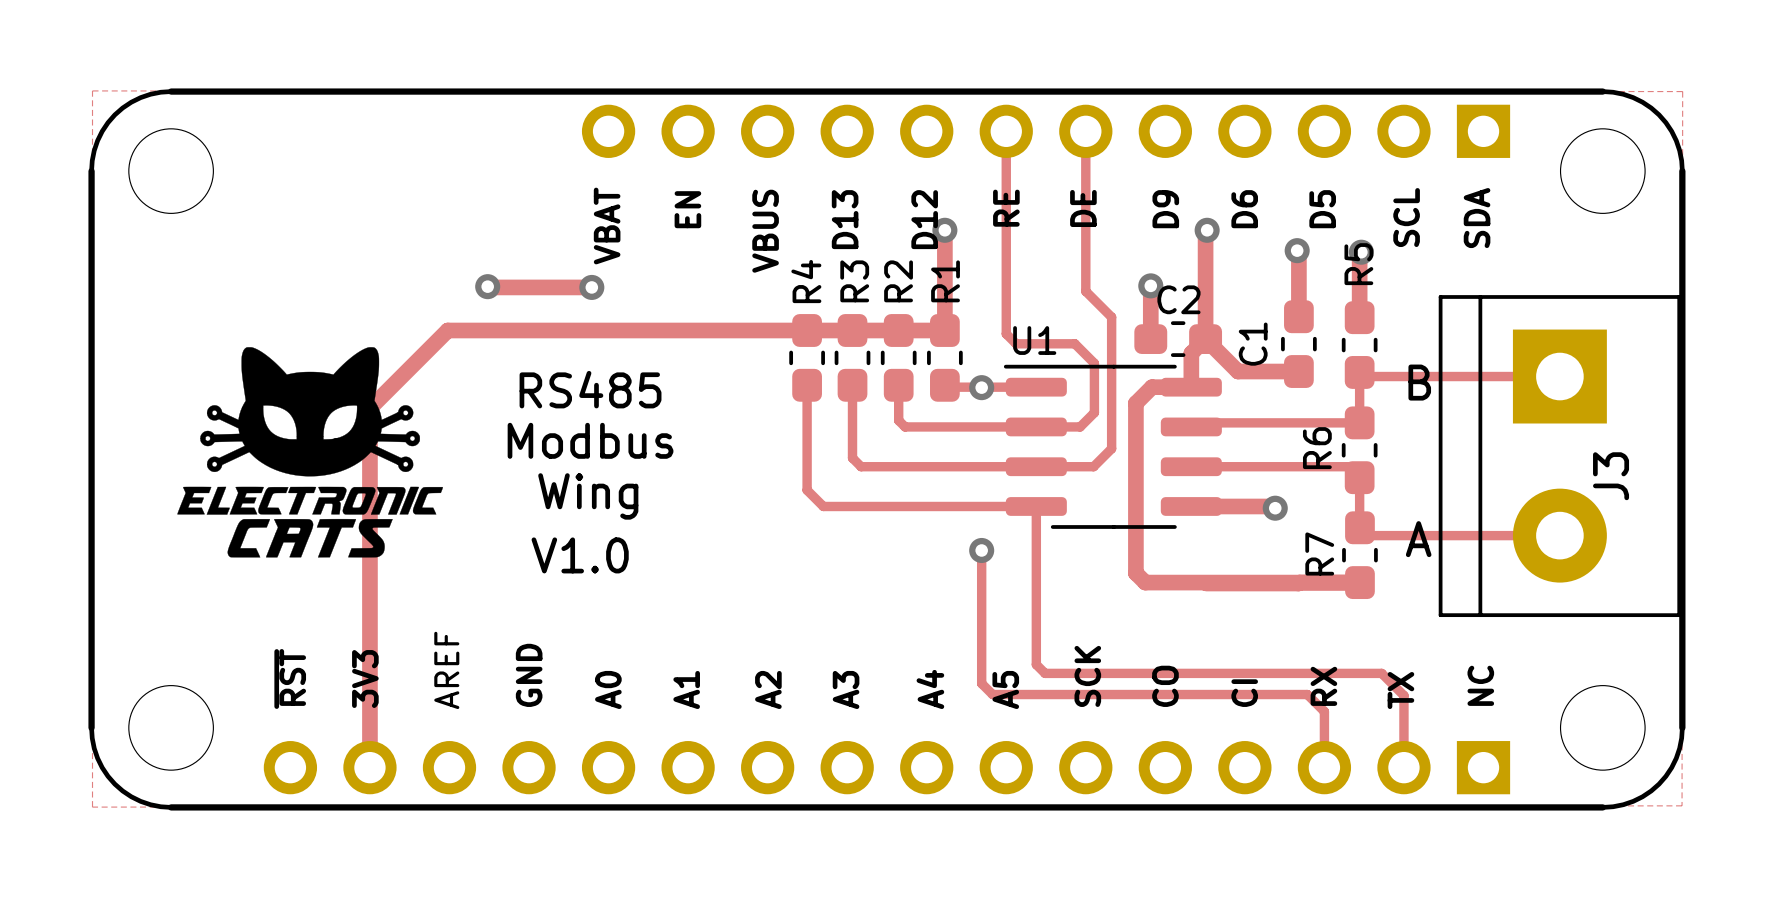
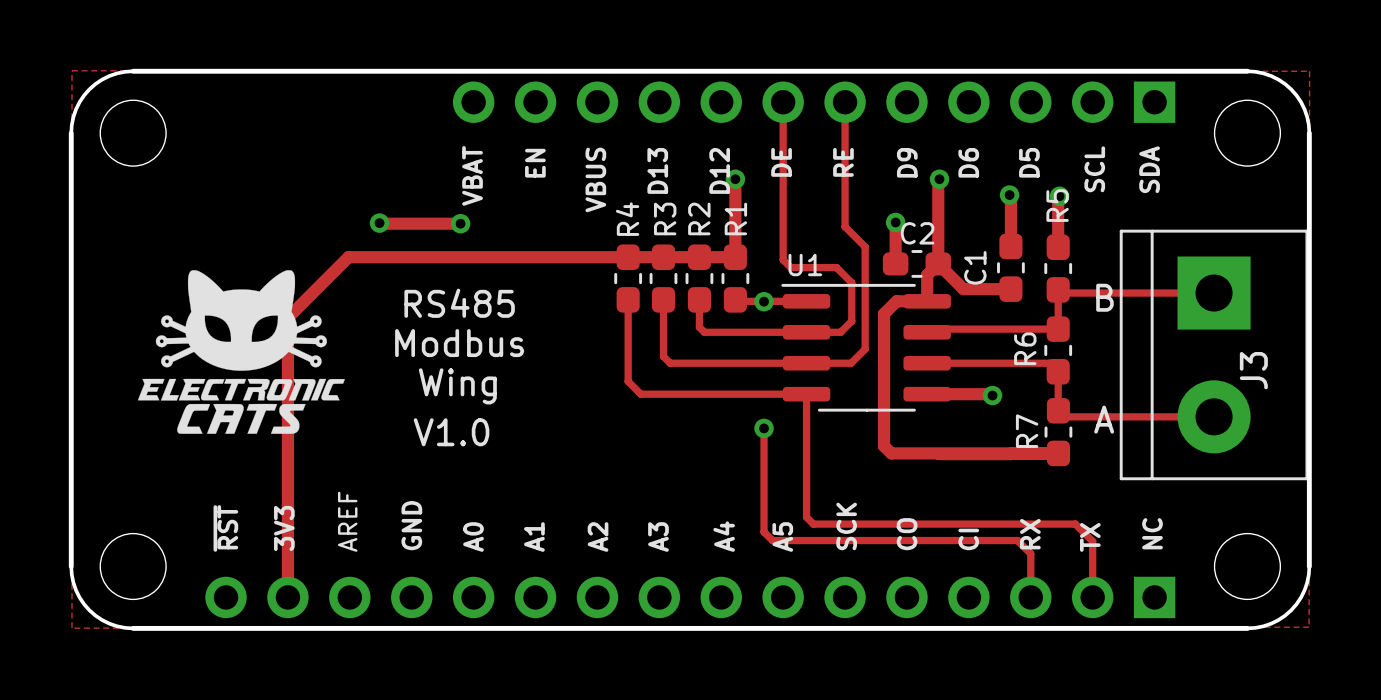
text: RE (1006, 208) -> DE (781, 162)
text: DE (1083, 208) -> RE (843, 162)

